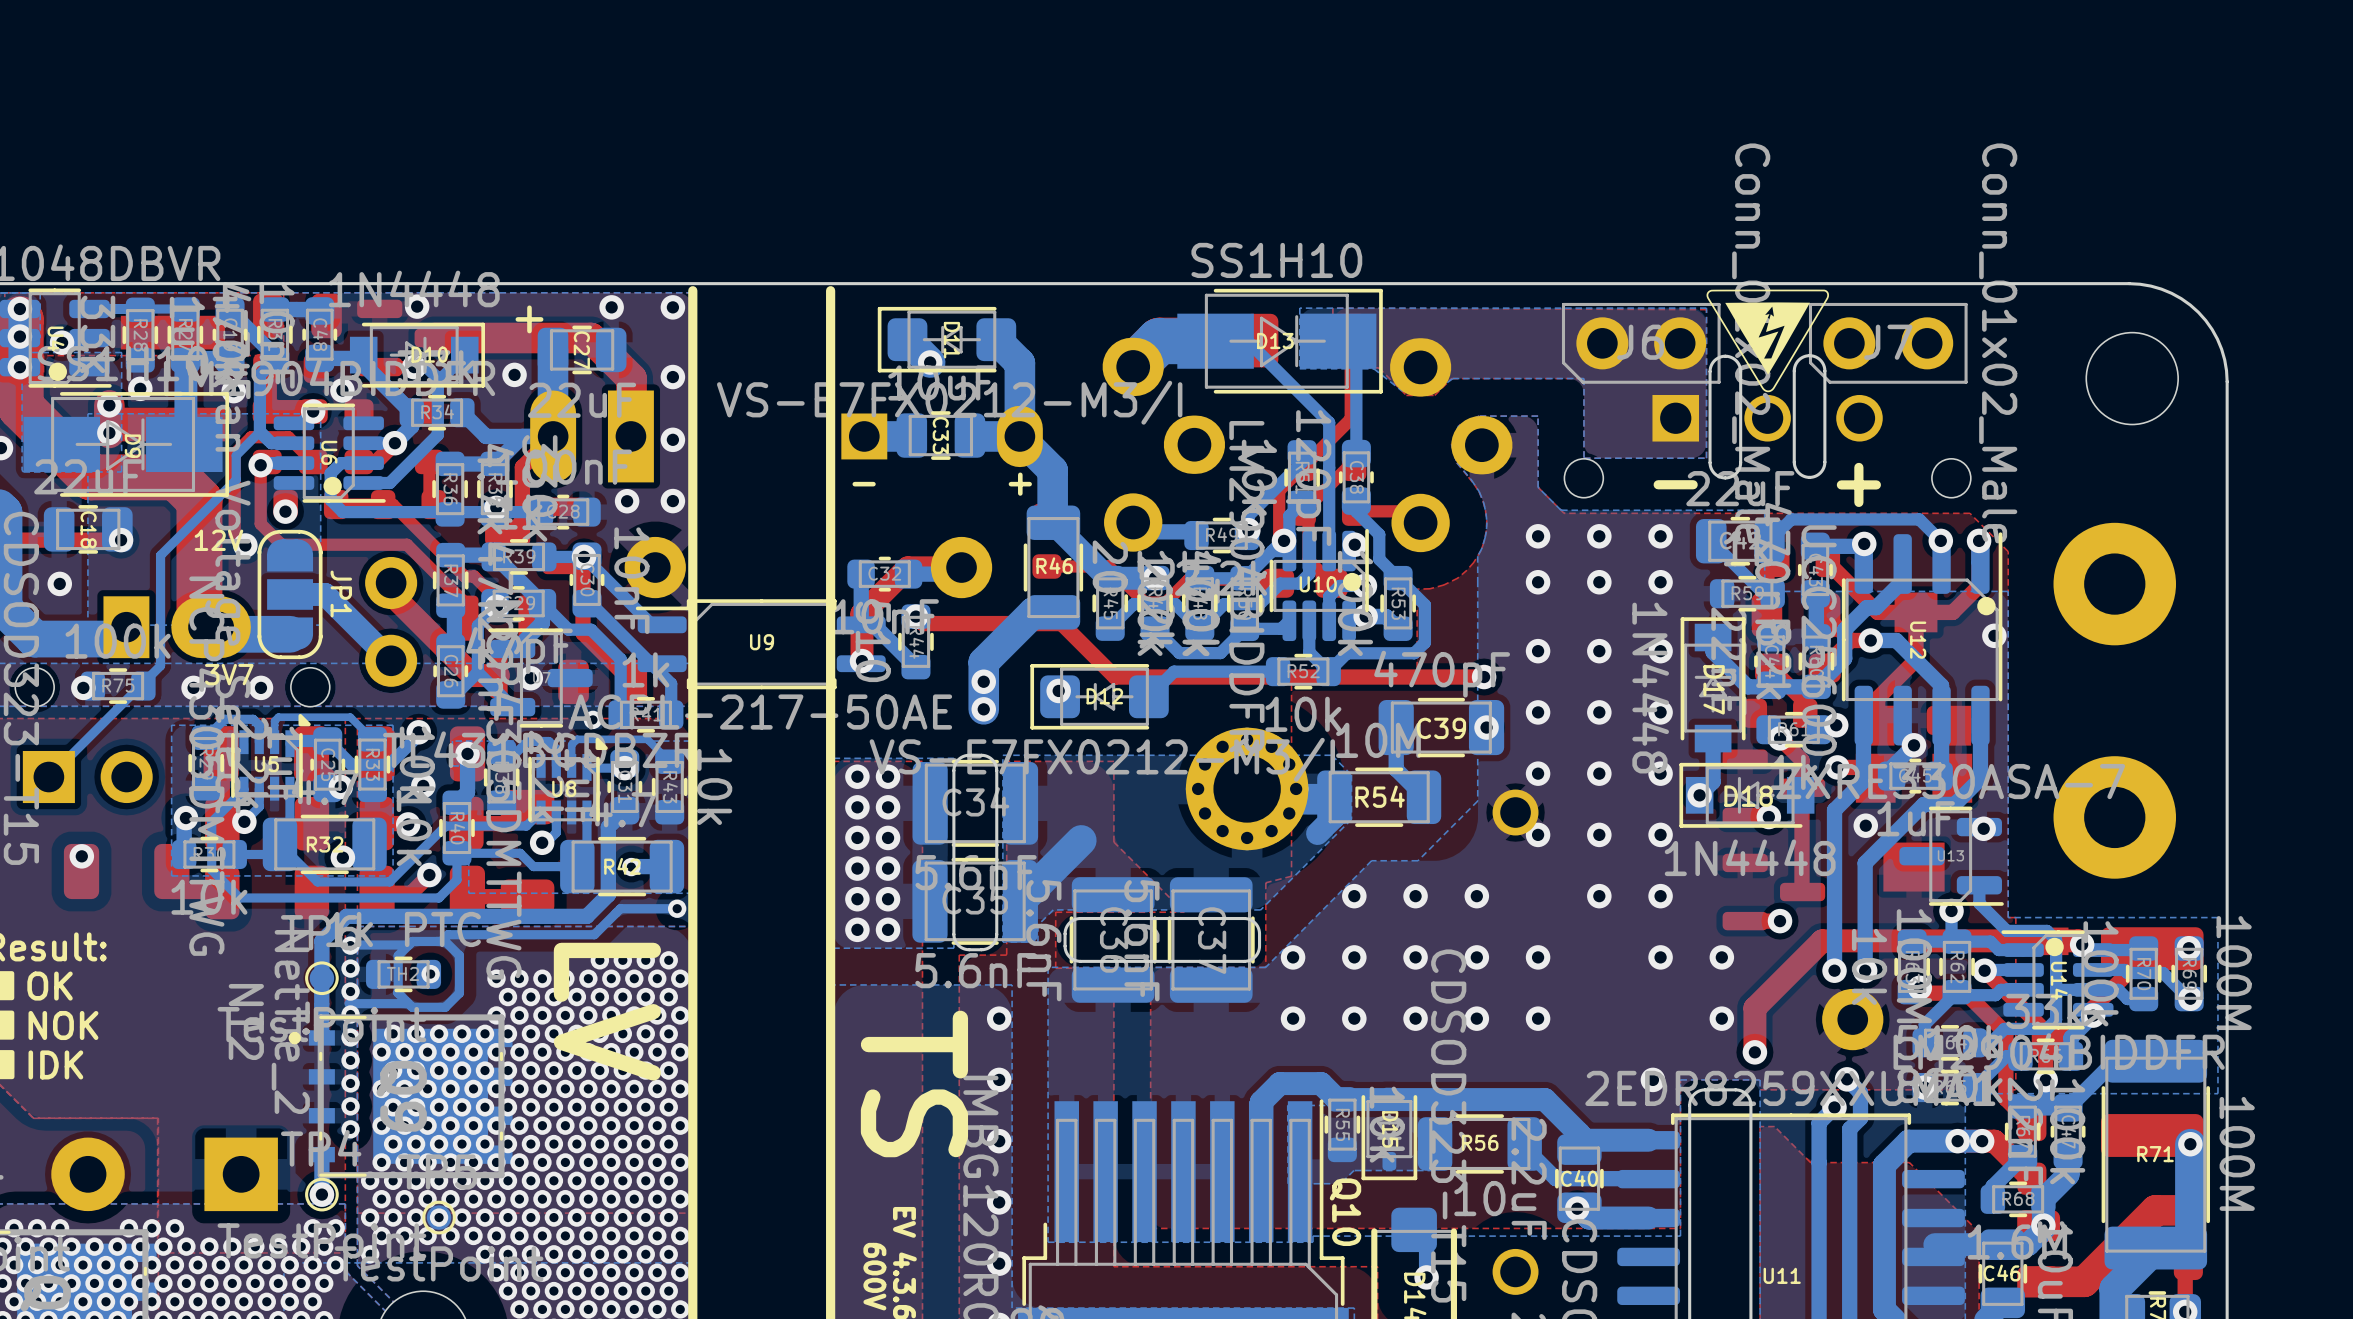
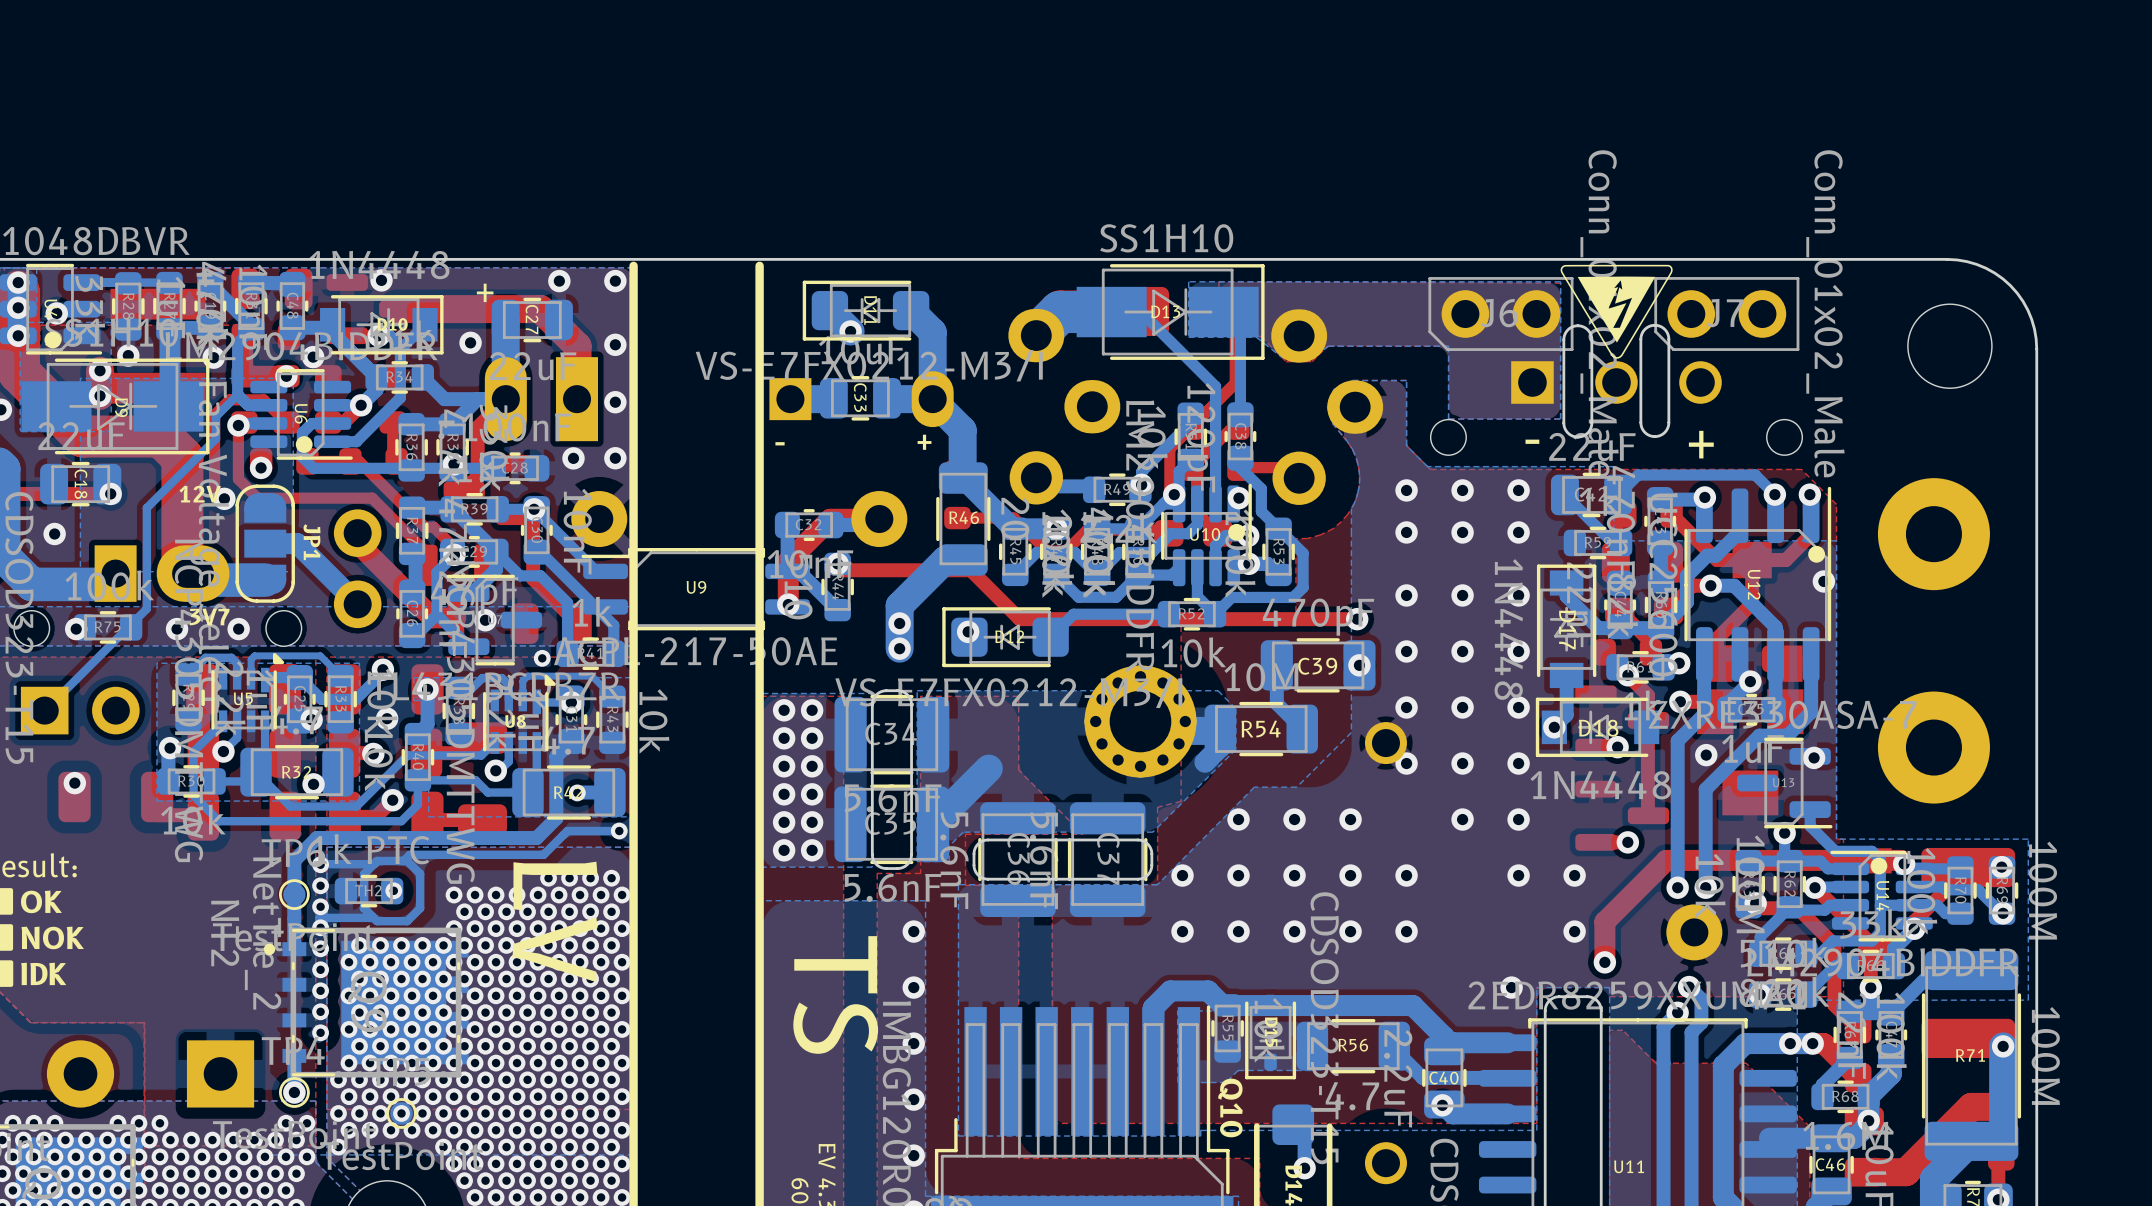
R56 value: 10 (1479, 1198) -> 4.7 (1352, 1096)

